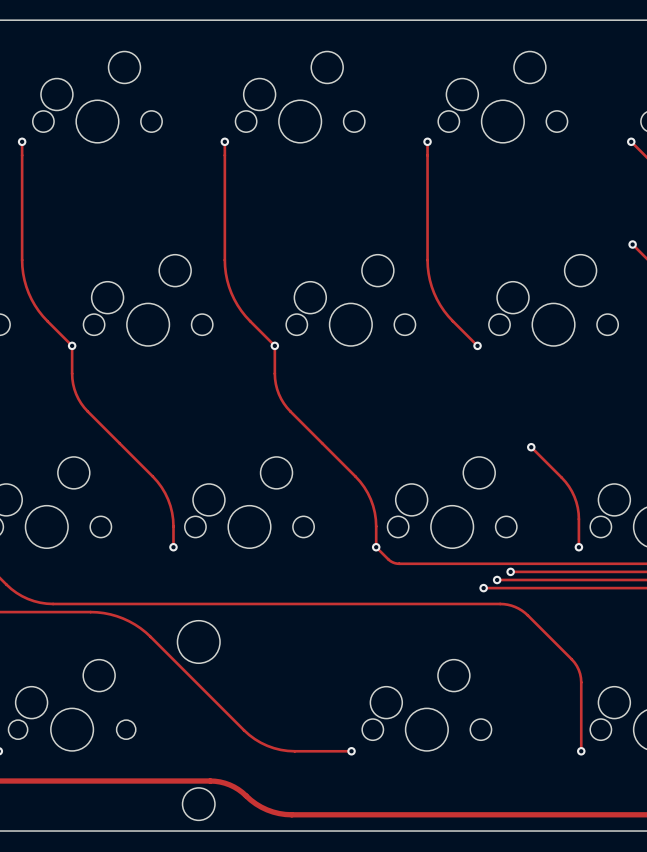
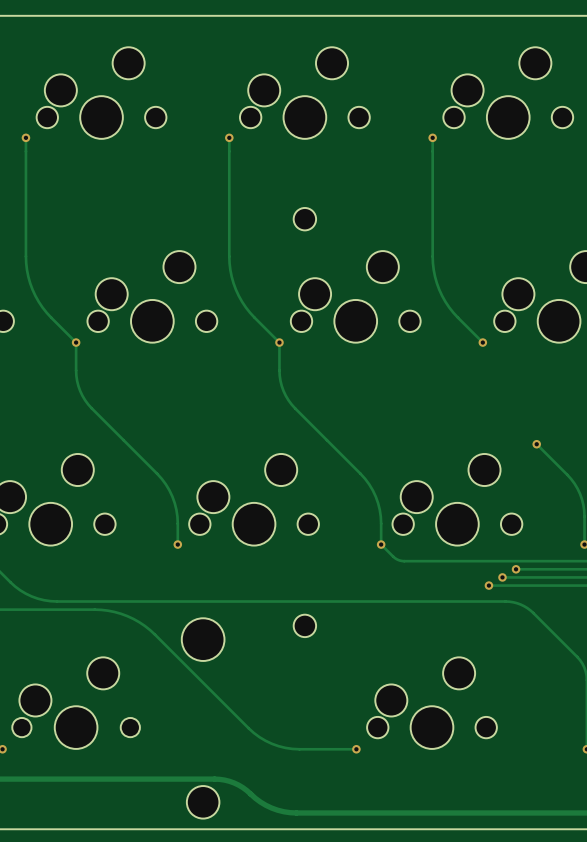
part: none -> (304, 219)
part: none -> (304, 625)

